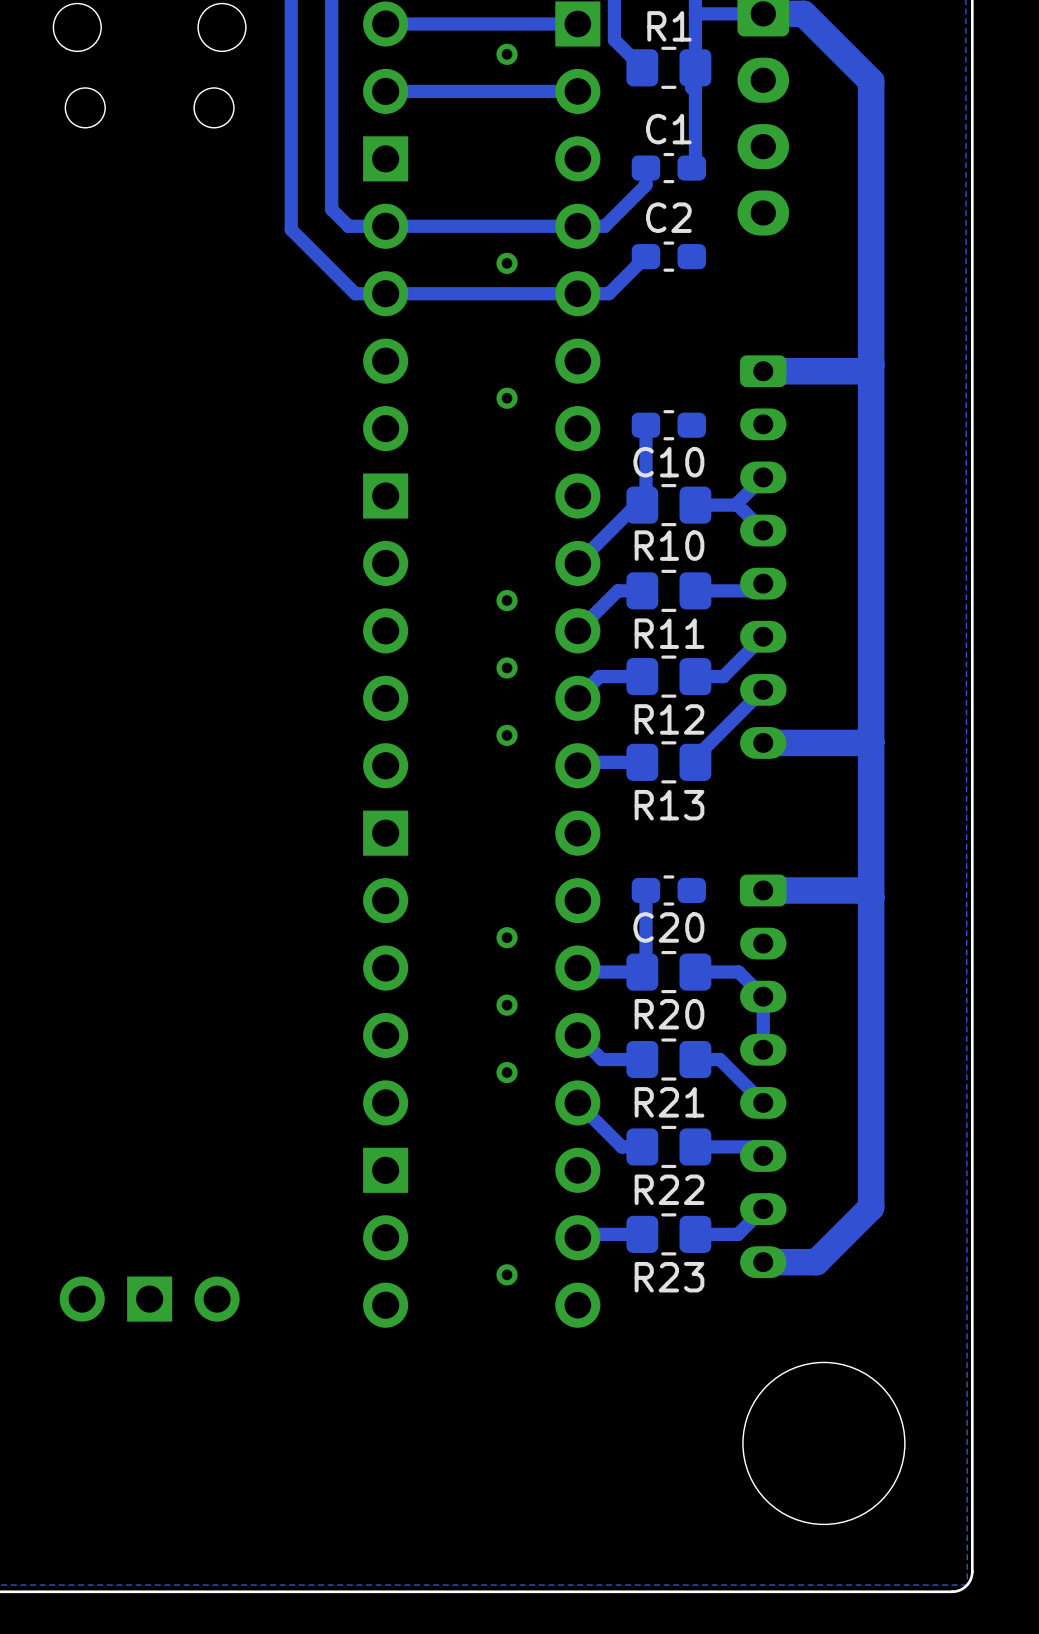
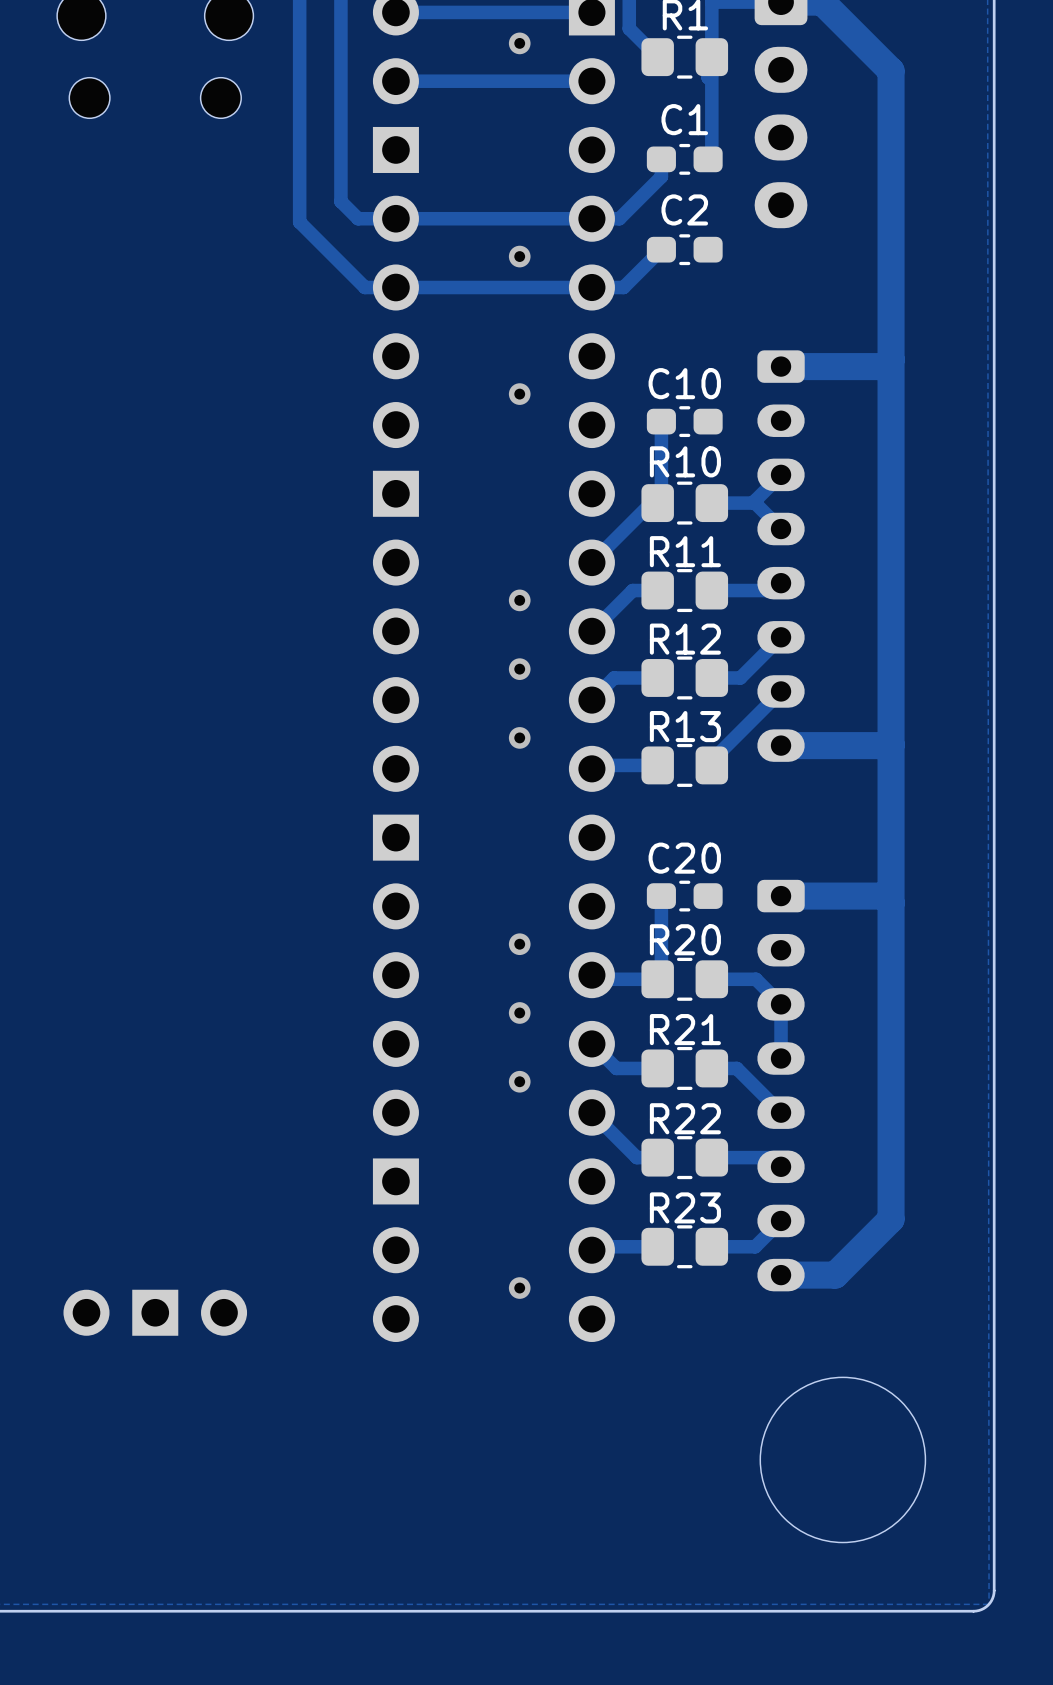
C10 name position: C10 (668, 462) -> C10 (684, 383)
R10 name position: R10 (669, 545) -> R10 (685, 461)
R11 name position: R11 (669, 633) -> R11 (685, 551)
R12 name position: R12 (669, 719) -> R12 (685, 639)
R13 name position: R13 (669, 805) -> R13 (685, 726)
C20 name position: C20 (668, 927) -> C20 (684, 858)
R20 name position: R20 (669, 1014) -> R20 (685, 939)
R21 name position: R21 (669, 1102) -> R21 (685, 1029)
R22 name position: R22 (669, 1189) -> R22 (685, 1118)
R23 name position: R23 (669, 1277) -> R23 (685, 1207)

